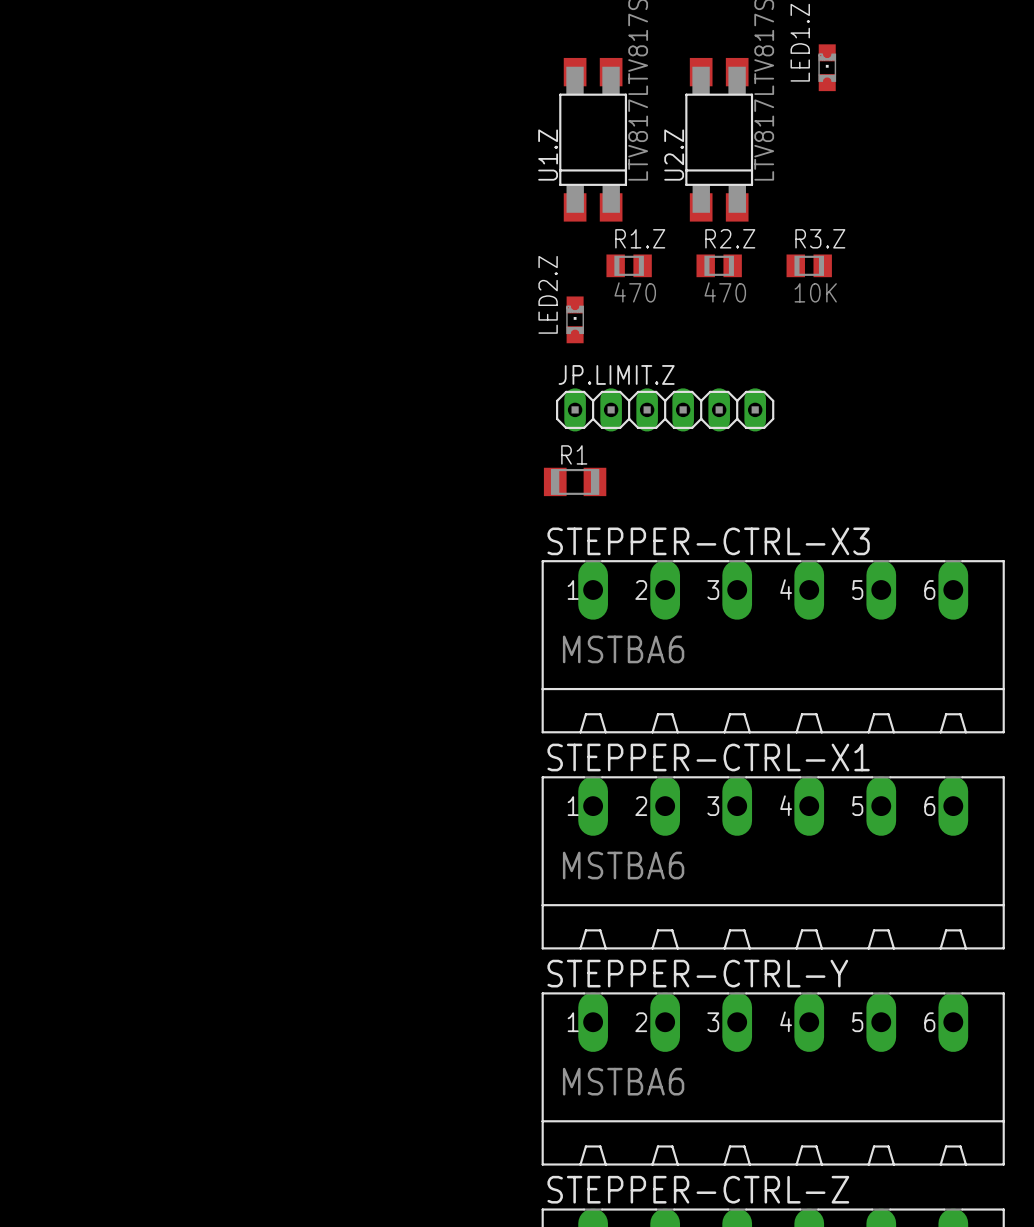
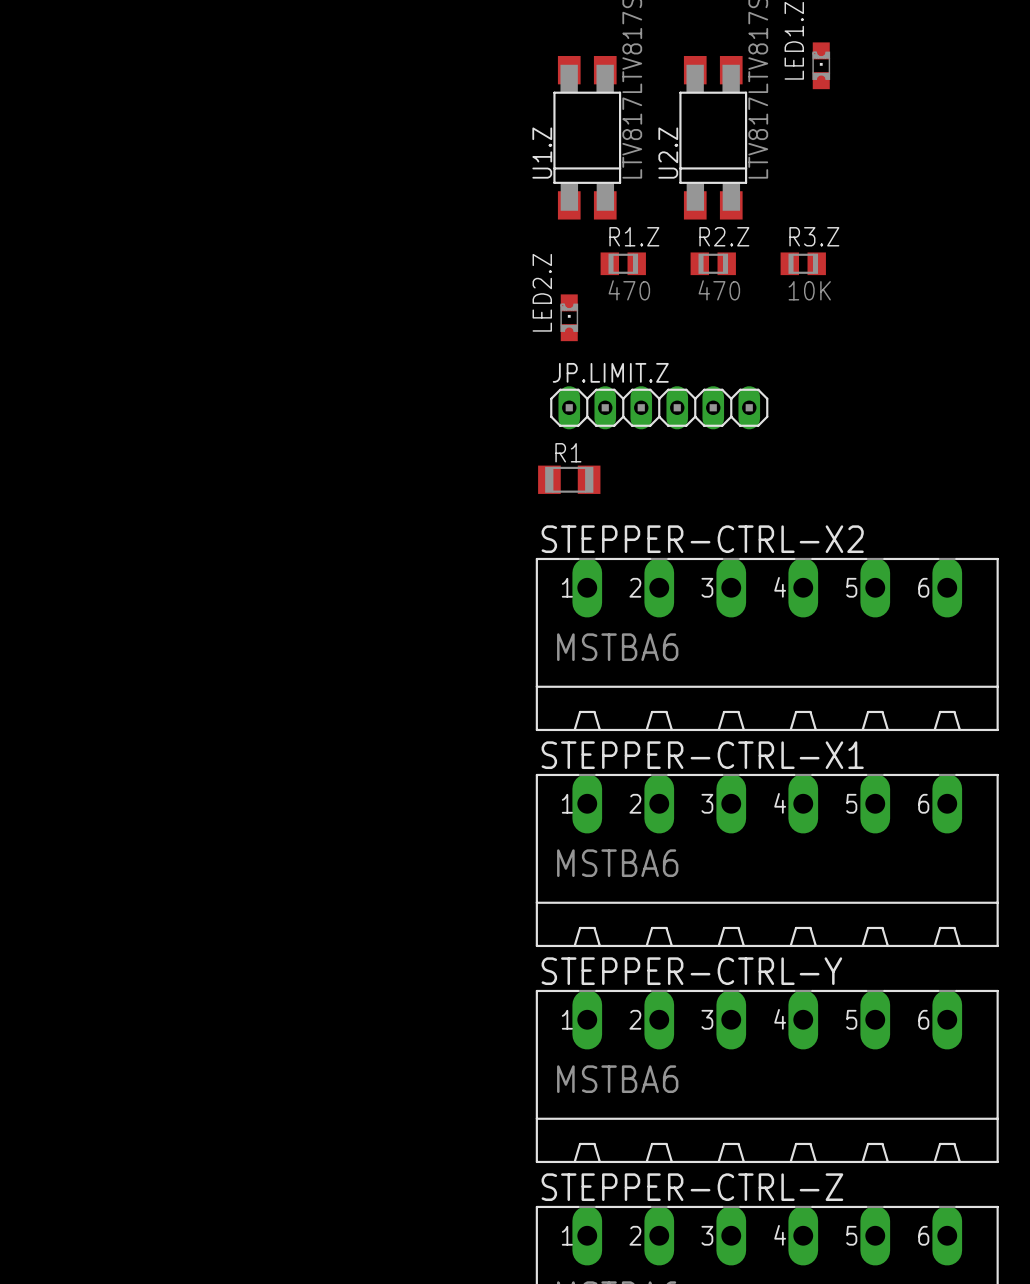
STEPPER-CTRL-X3 name: STEPPER-CTRL-X3 (708, 541) -> STEPPER-CTRL-X2 (702, 539)

